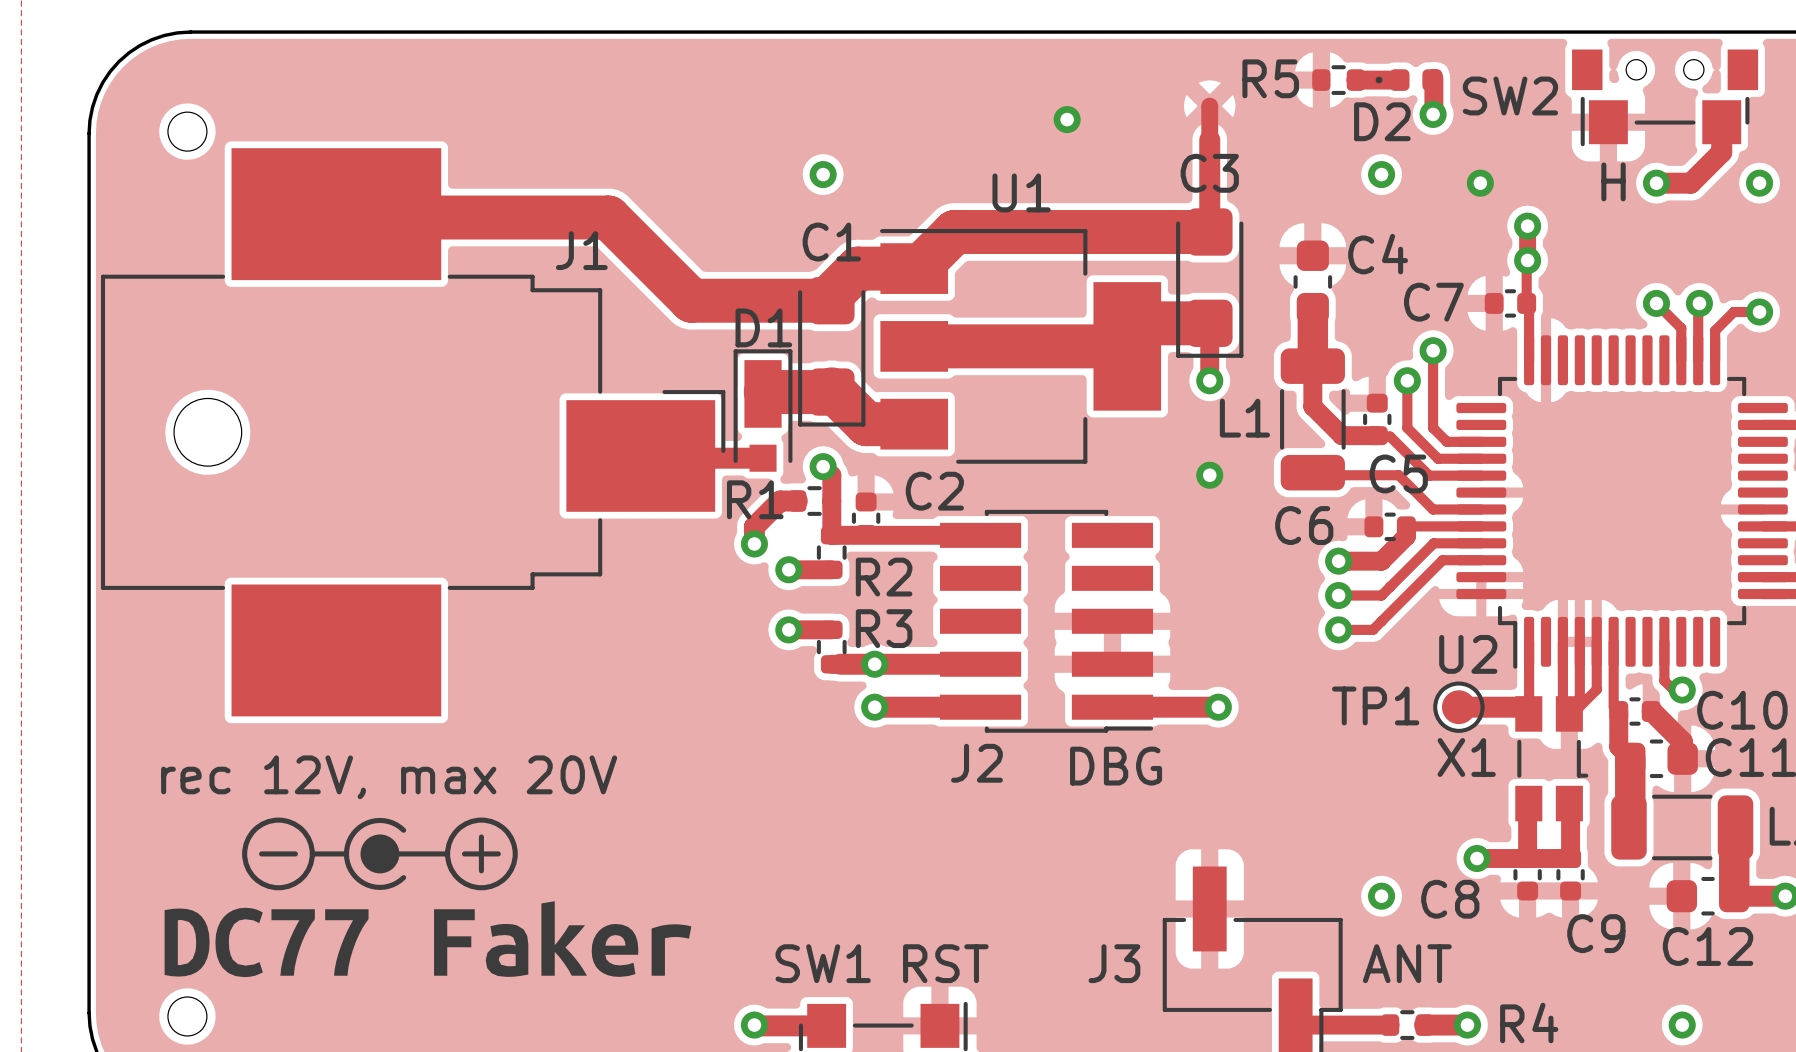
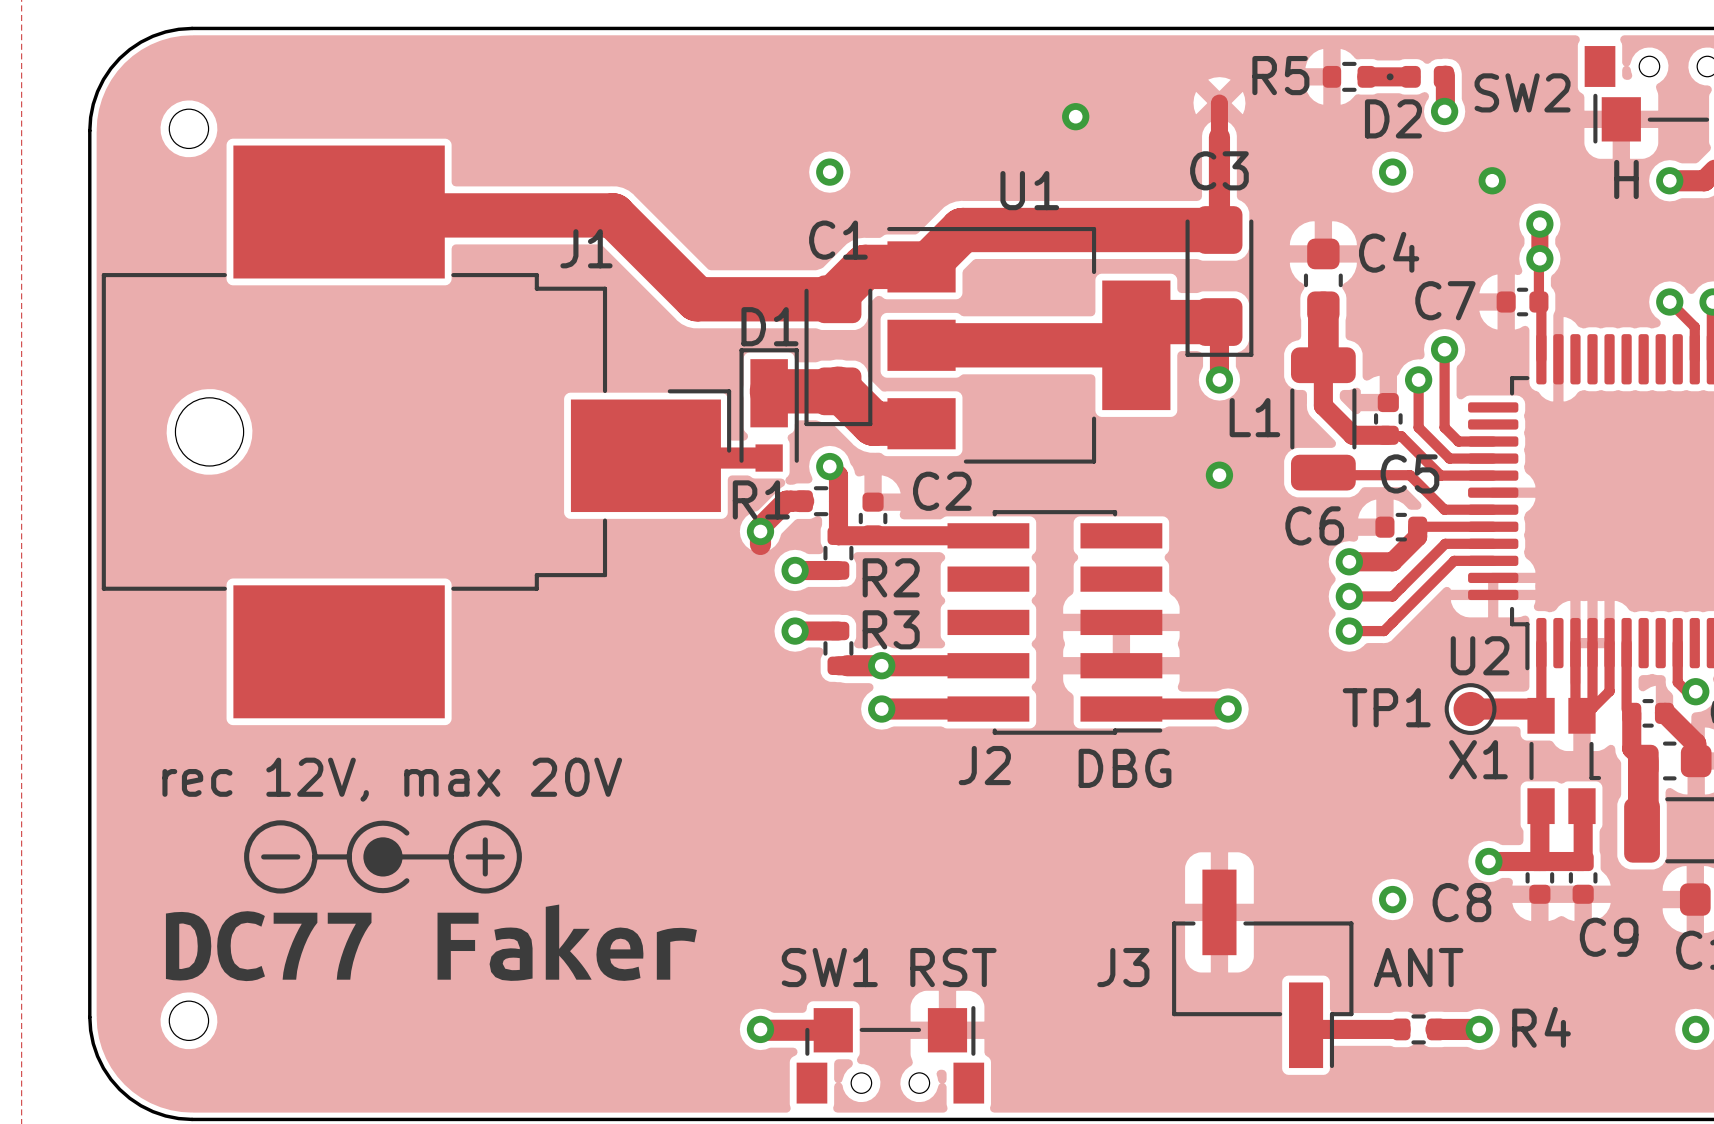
via position: (754, 543) -> (760, 531)

